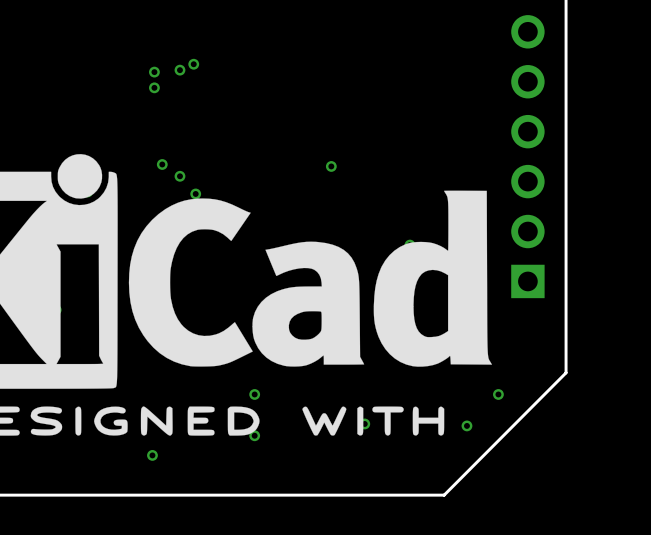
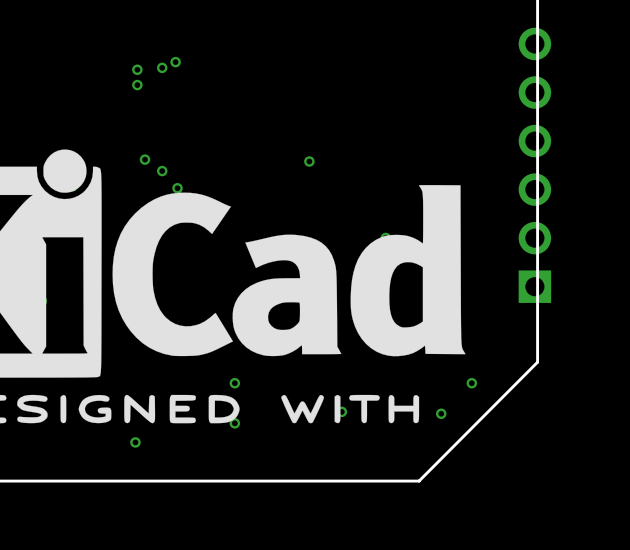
part position: (527, 156) -> (534, 165)

